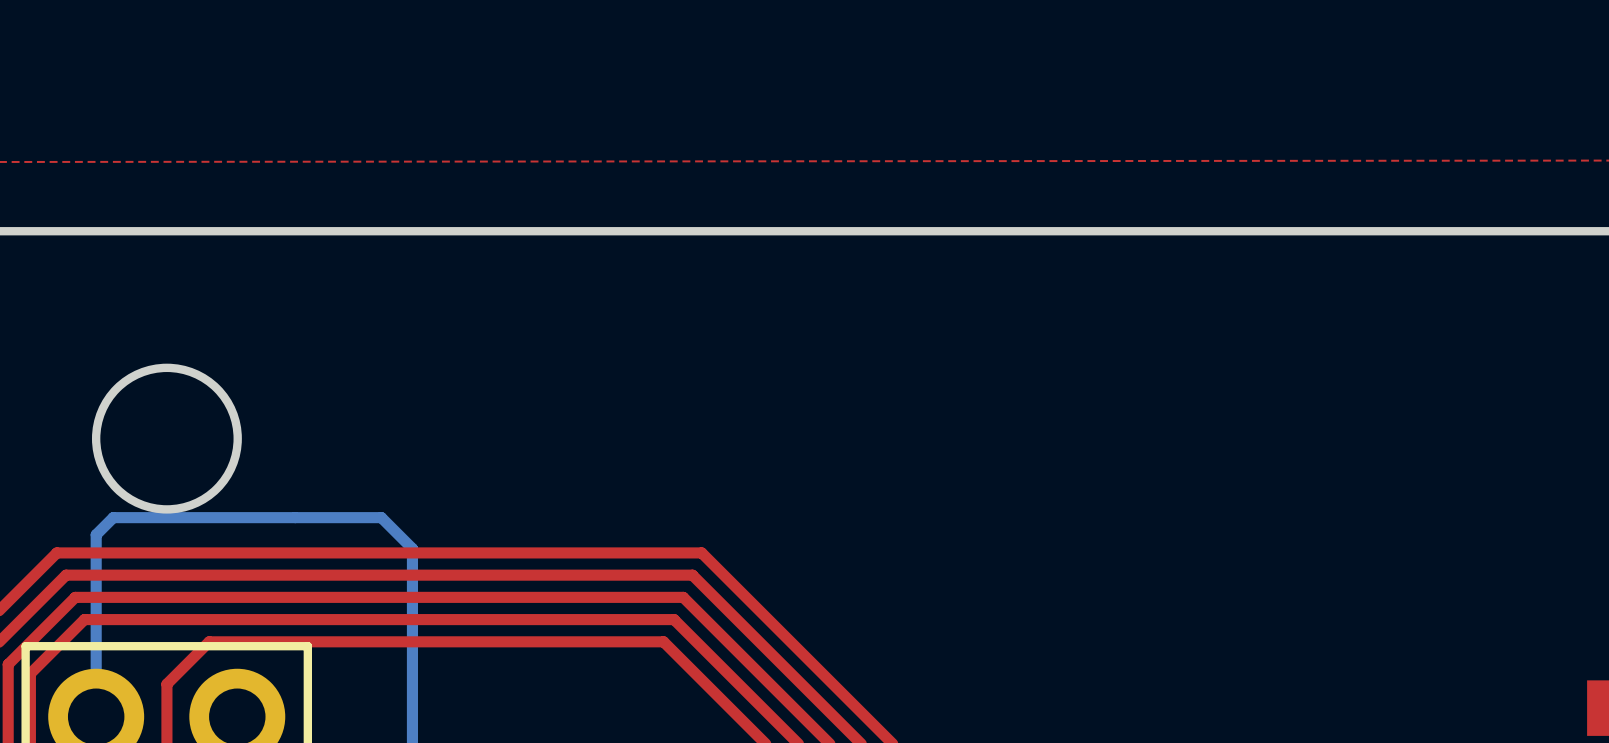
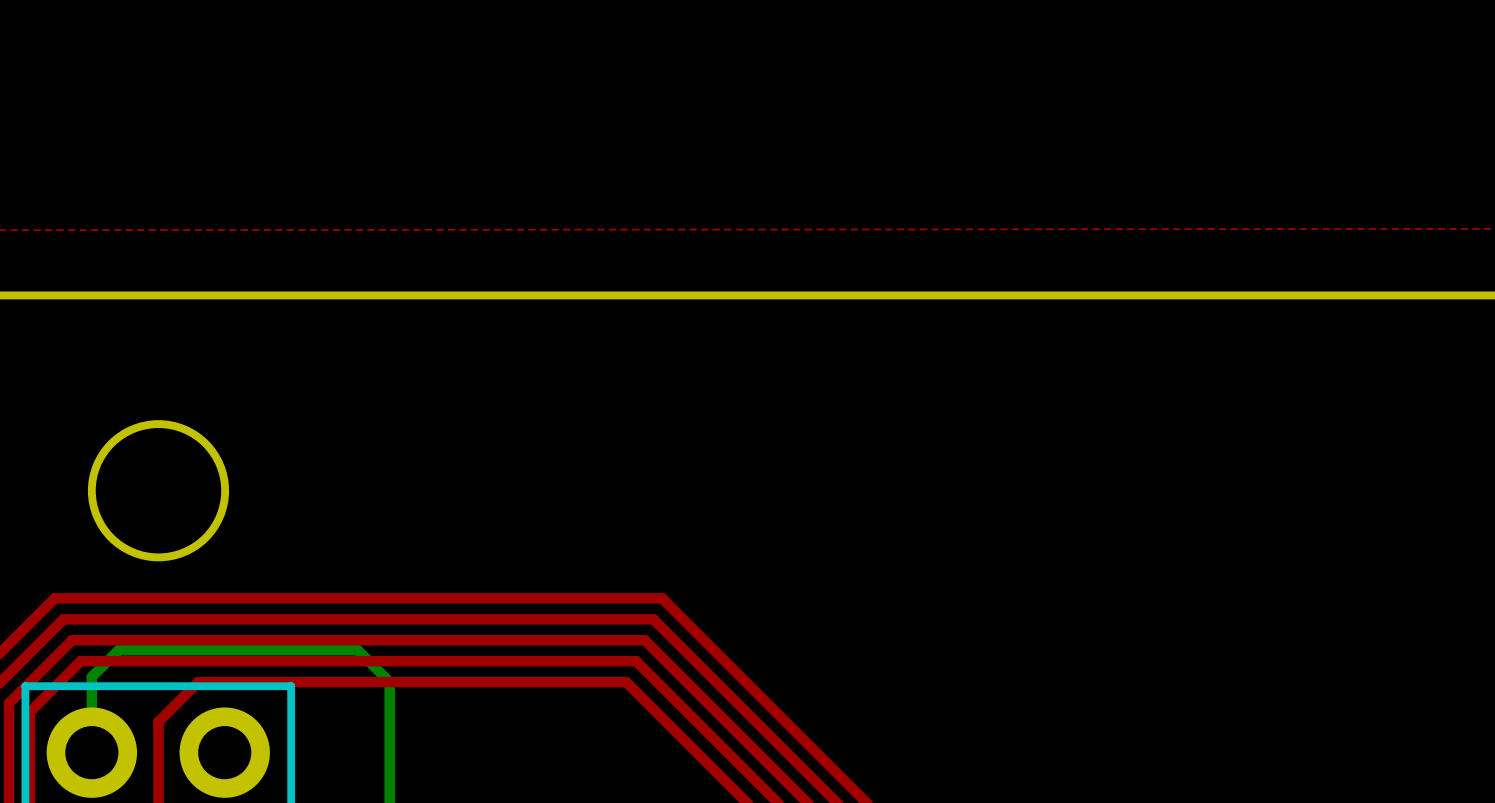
bottom track: (96, 636) (96, 534) (113, 517) (381, 517) (412, 548) (412, 641) -> (91, 676) (118, 650) (357, 650) (389, 682)

